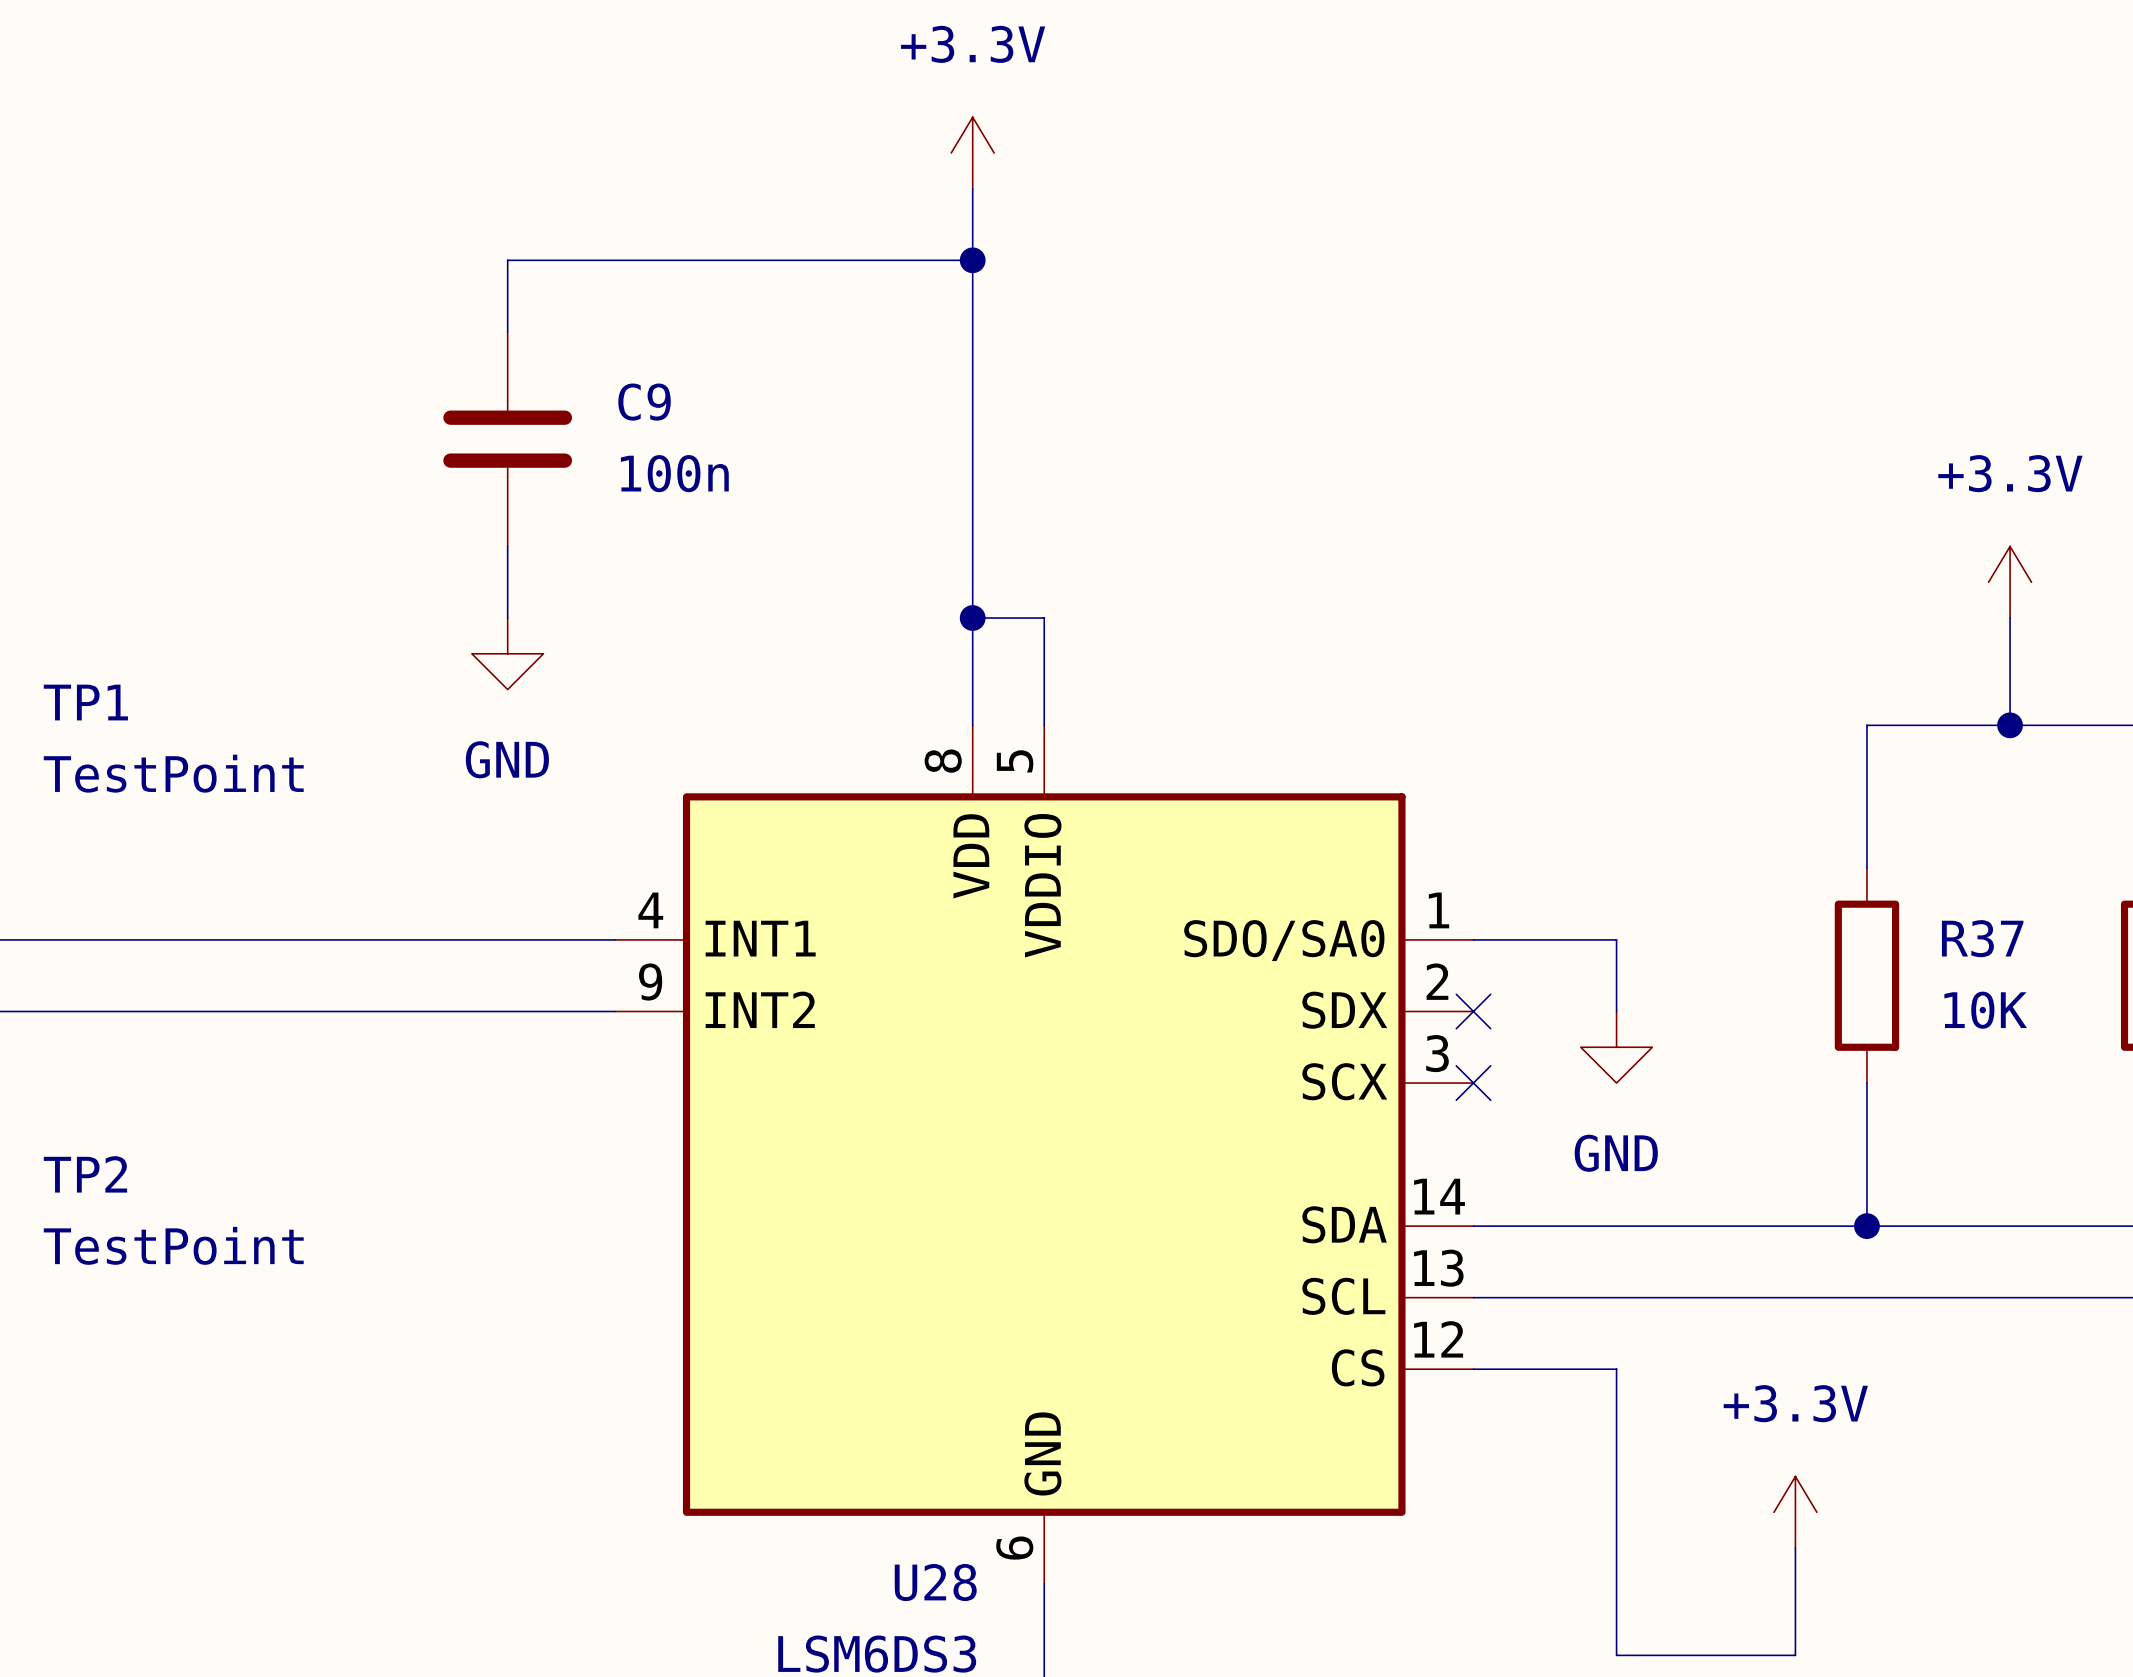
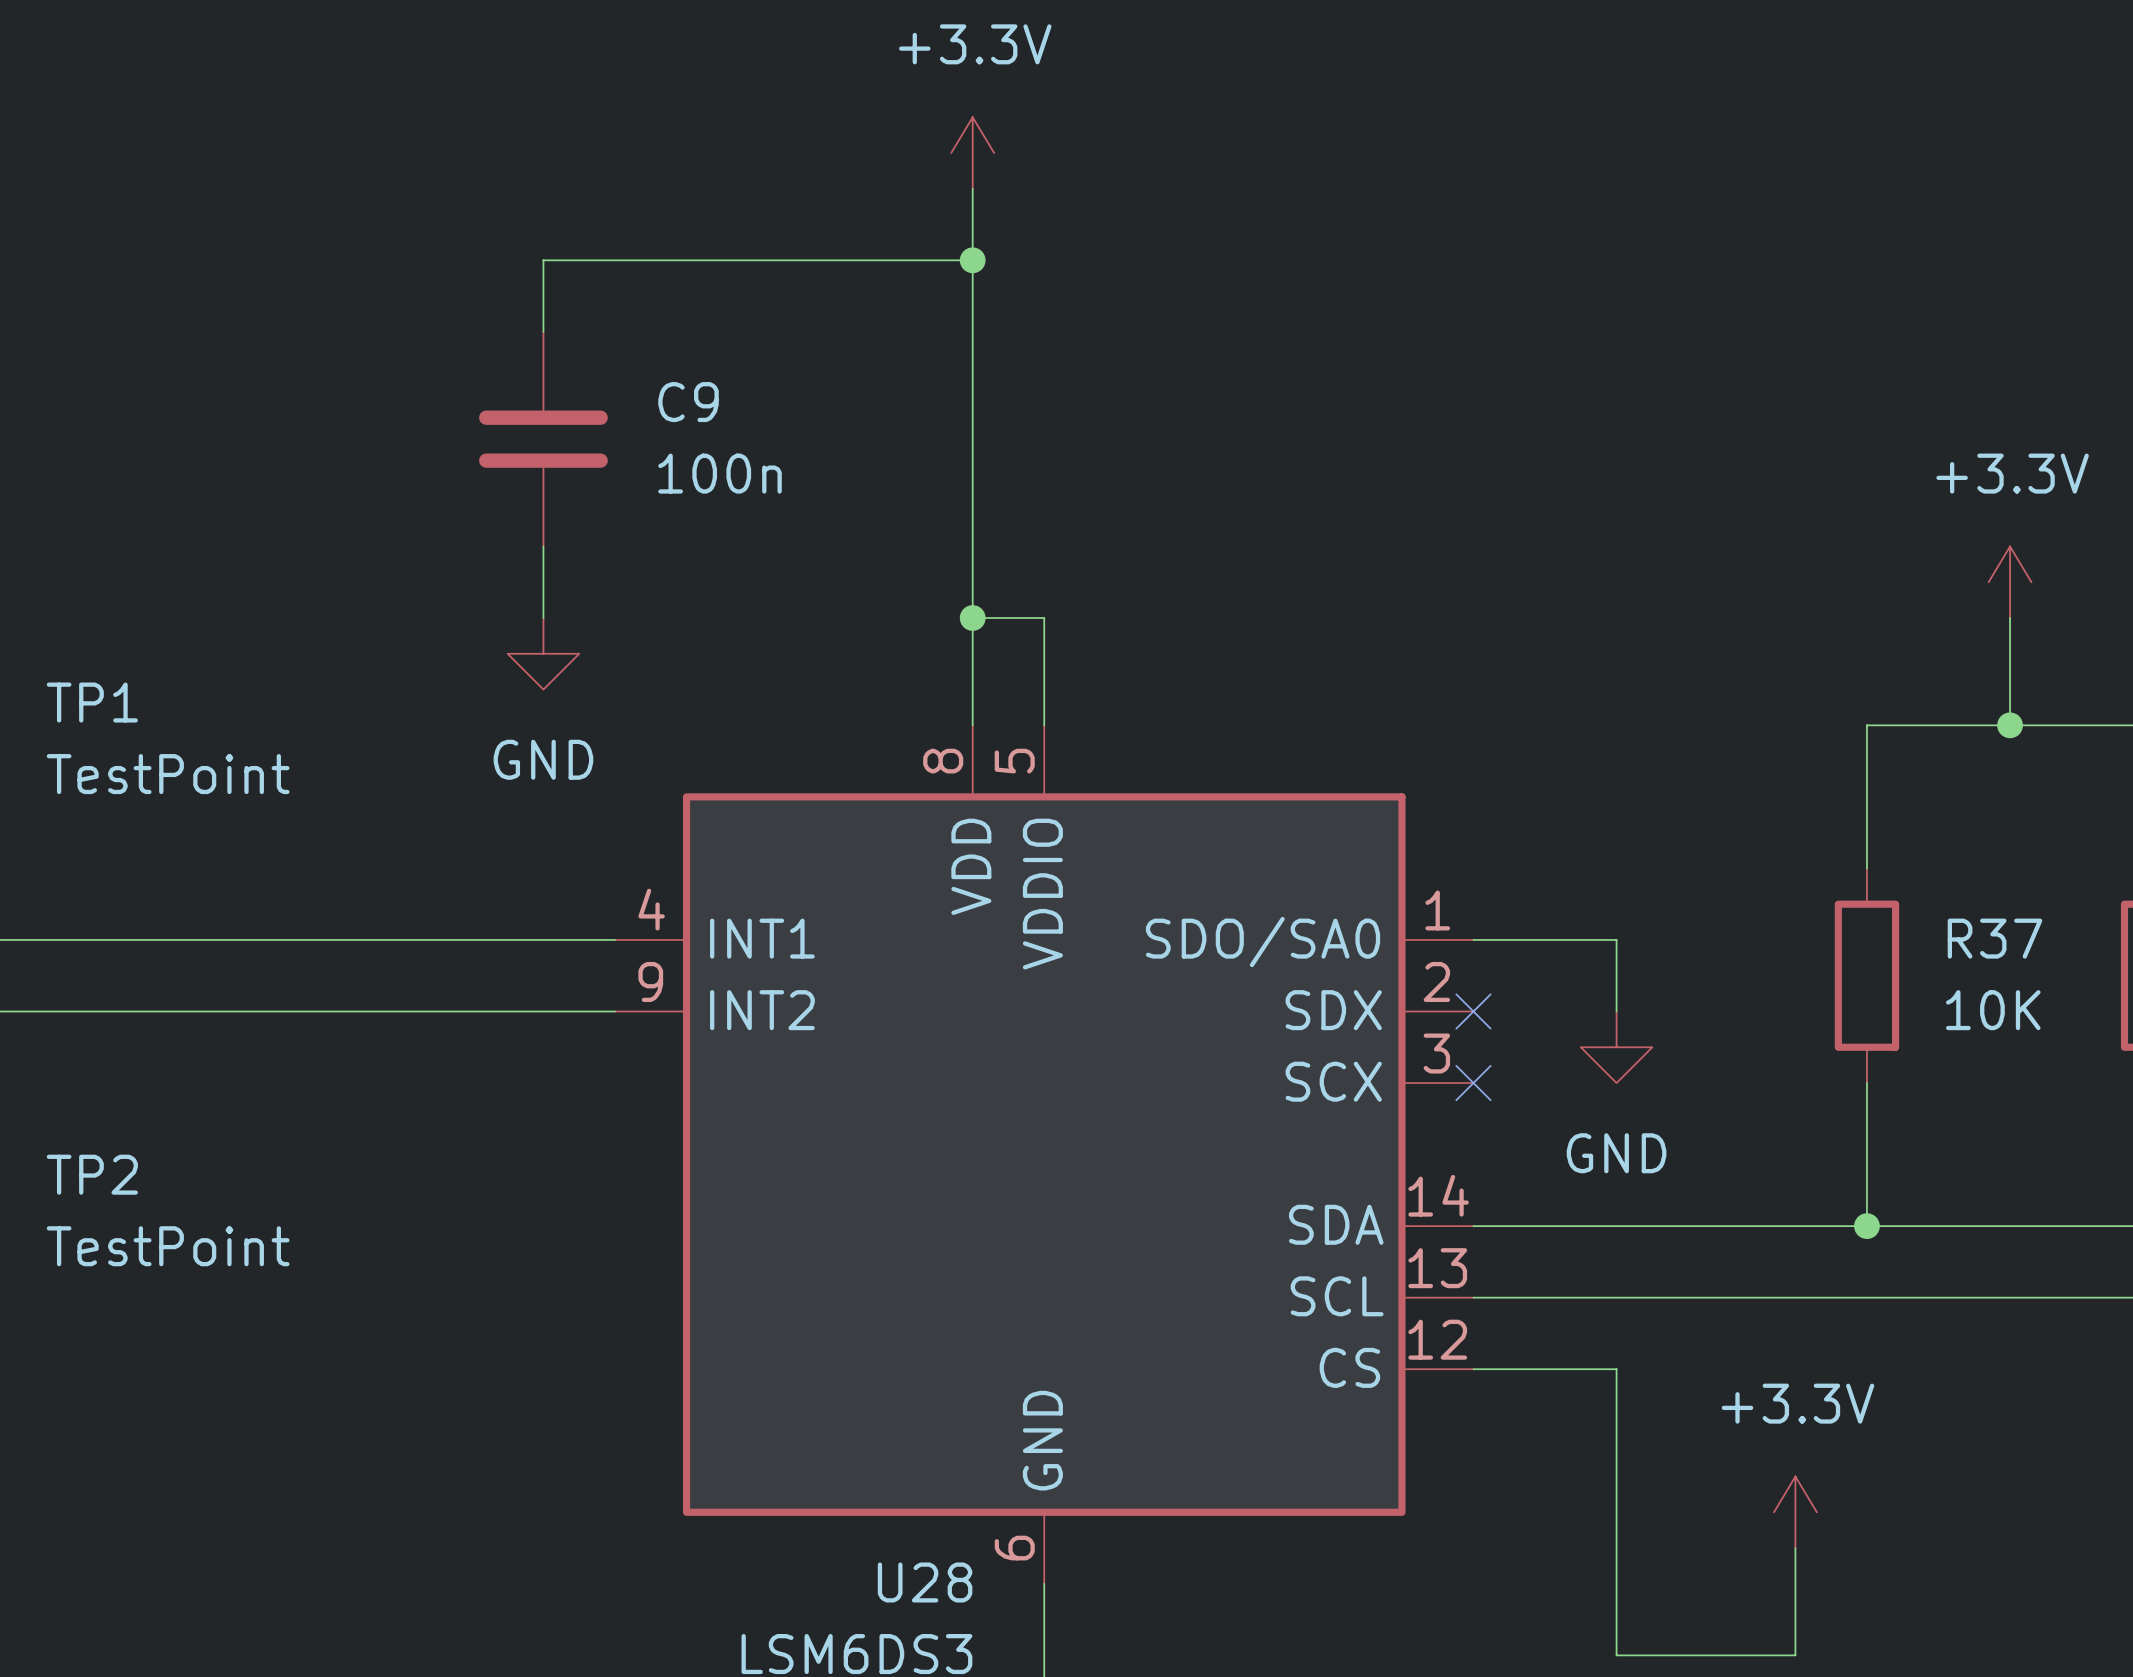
wire: (543, 260) (507, 260) (507, 331) -> (543, 260) (543, 331)
C9 position: (507, 439) -> (543, 439)
wire: (507, 546) (507, 618) -> (543, 546) (543, 618)
power symbol position: GND (507, 653) -> GND (543, 653)

